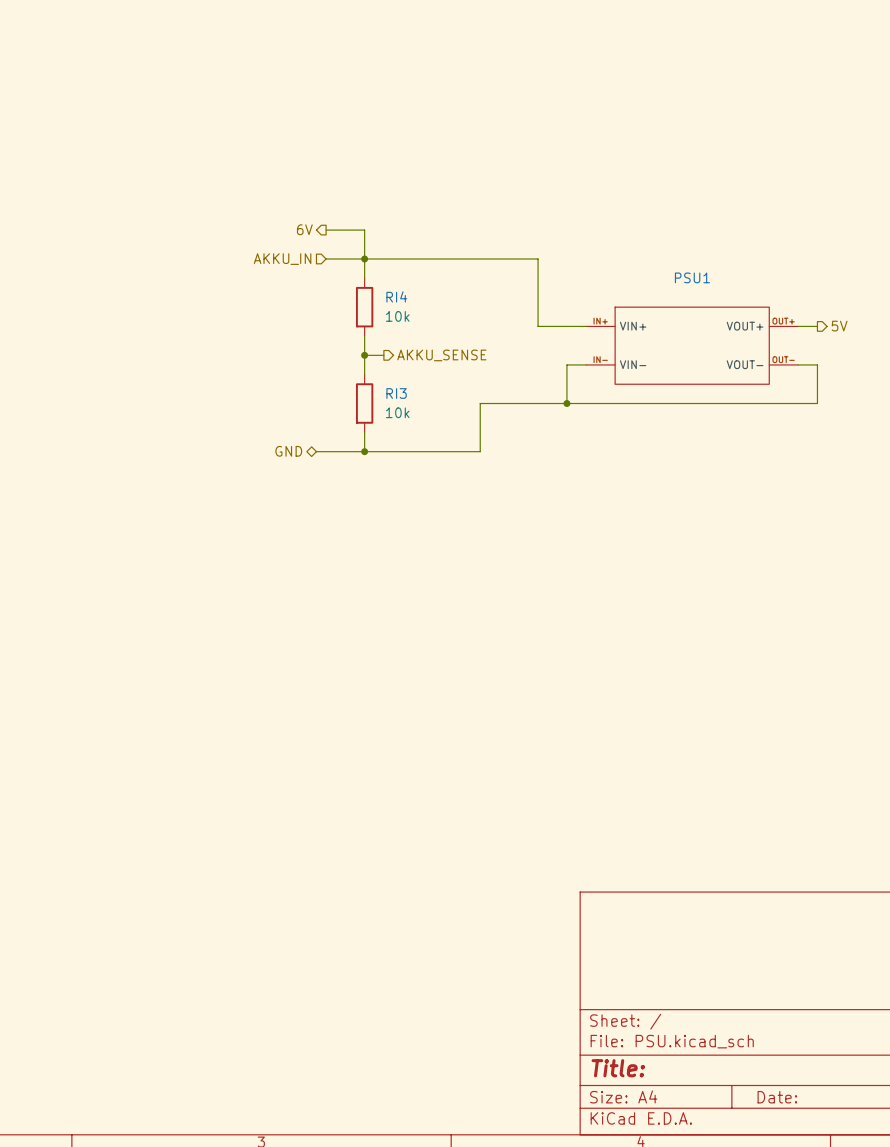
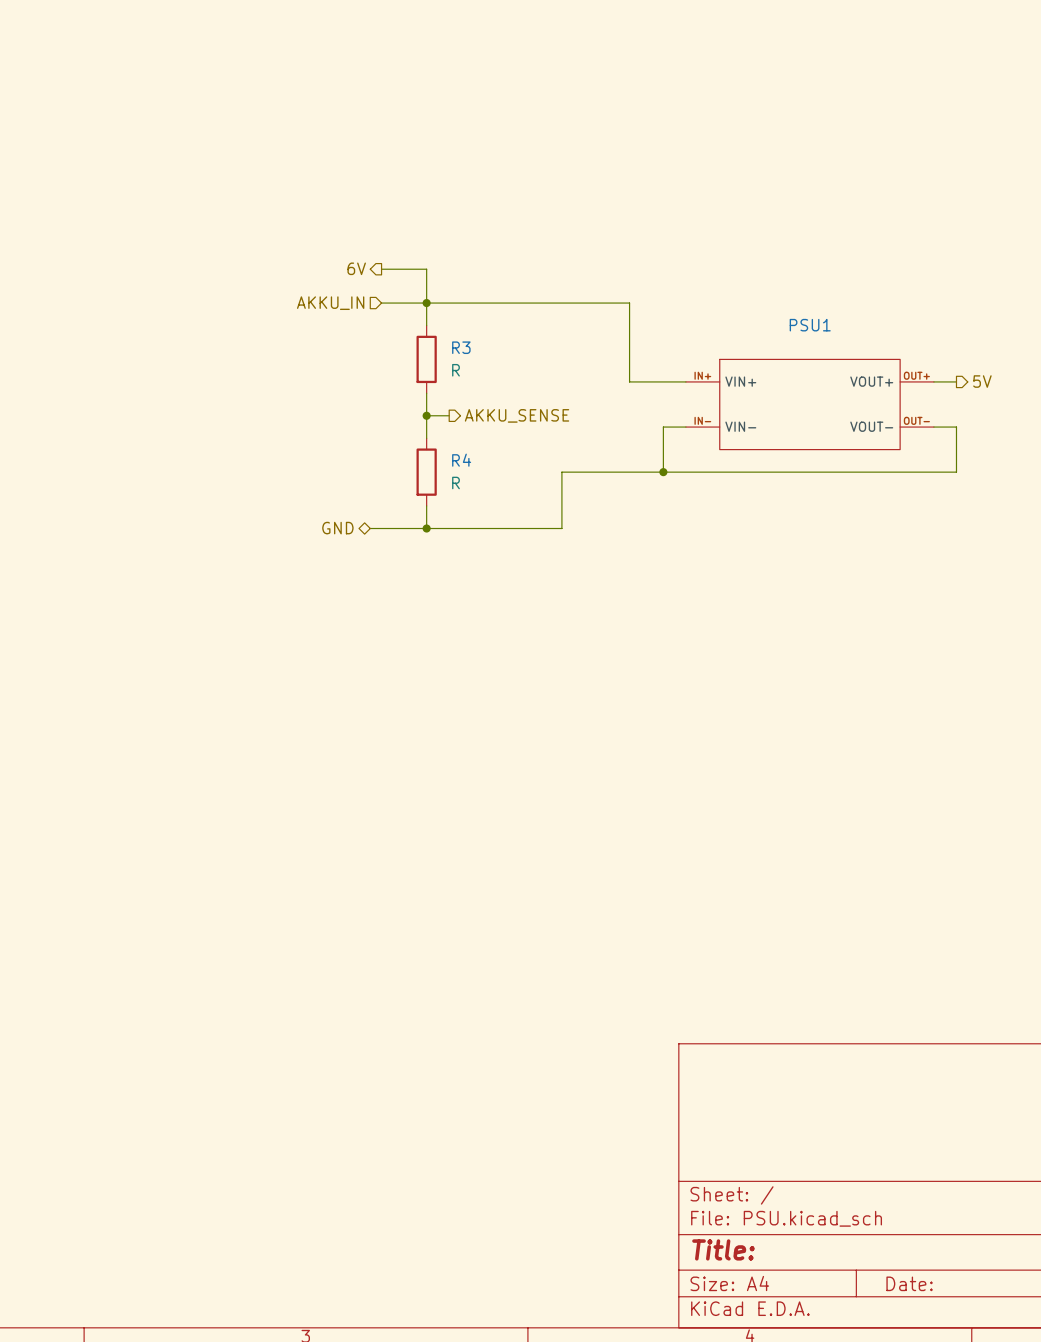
RI4 name: RI4 (396, 296) -> R3 (461, 347)
RI4 value: 10k (397, 316) -> R (455, 370)
RI3 name: RI3 (396, 393) -> R4 (461, 460)
RI3 value: 10k (397, 412) -> R (455, 482)

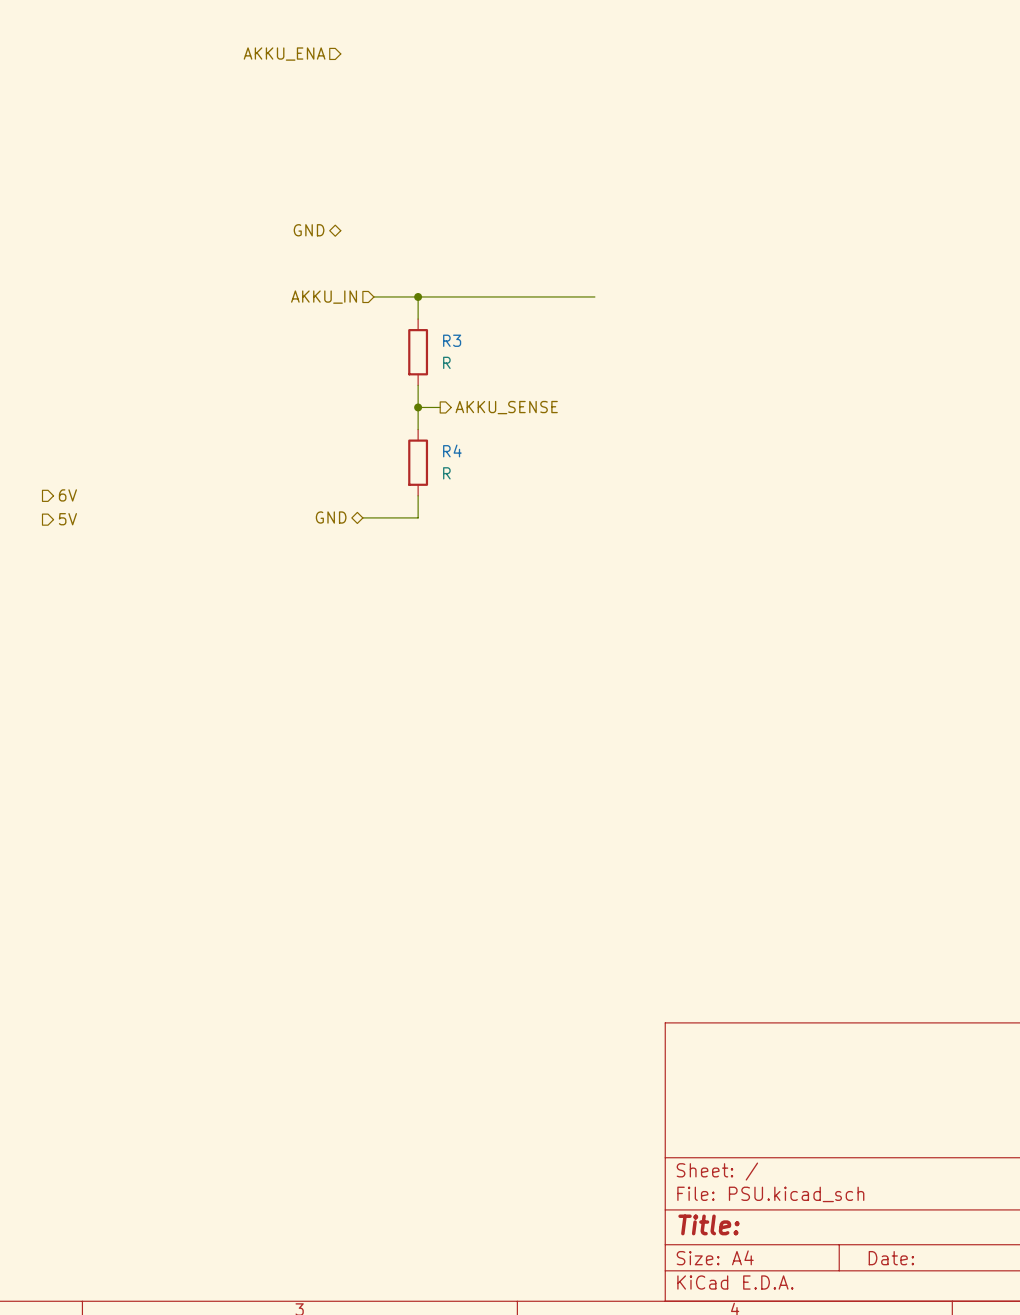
hierarchical label: none -> AKKU_ENA (284, 54)
hierarchical label: none -> GND (309, 230)
hierarchical label: 6V (356, 268) -> none
wire: (381, 269) (426, 269) (426, 303) -> none
wire: (607, 303) (629, 303) (629, 381) (685, 381) -> none
wire: (933, 381) (956, 381) -> none
hierarchical label: 5V (982, 381) -> none
PSU1: (809, 404) -> none
wire: (685, 427) (663, 427) (663, 472) -> none
wire: (933, 427) (956, 427) (956, 472) (561, 472) (561, 528) (426, 528) -> none
junction: (663, 472) -> none
hierarchical label: none -> 6V (67, 495)
junction: (426, 528) -> none
hierarchical label: none -> 5V (67, 519)

